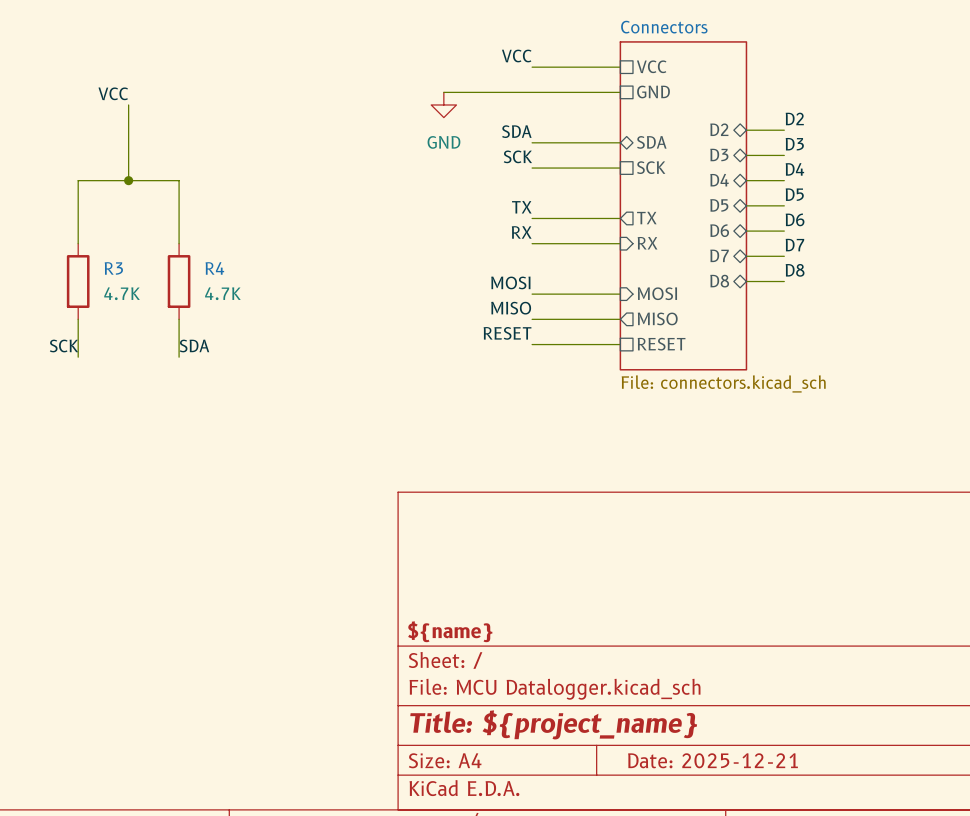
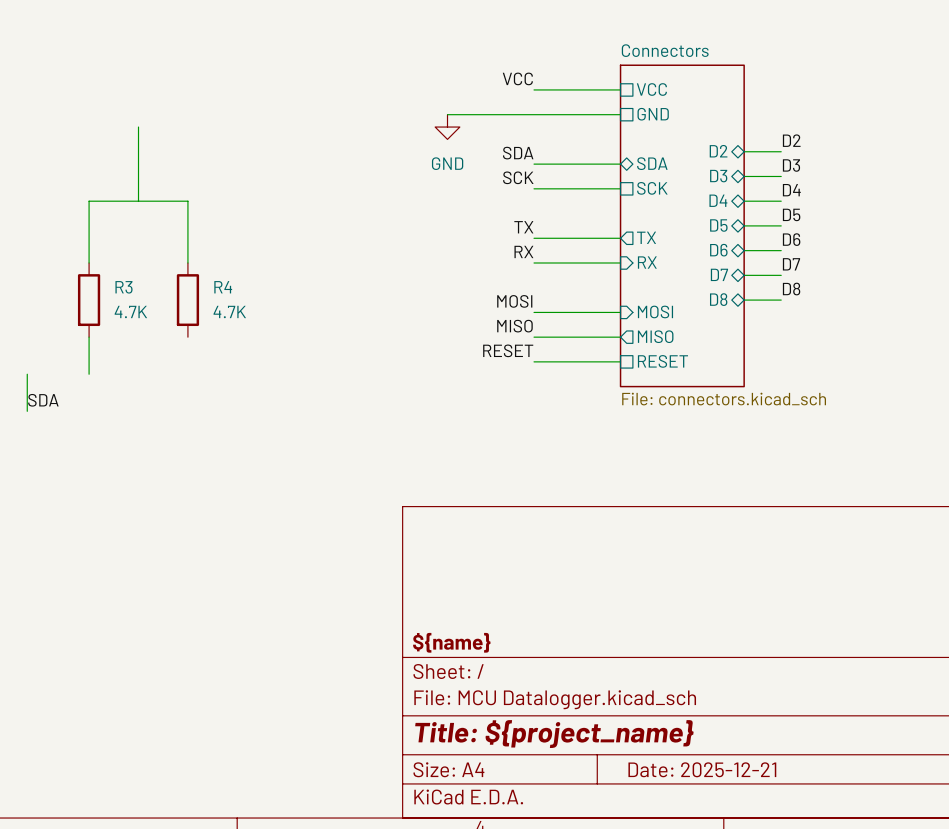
label: VCC (113, 93) -> none
junction: (128, 180) -> none
wire: (179, 319) (179, 357) -> (27, 374) (27, 411)
label: SCK (63, 345) -> none
label: SDA (194, 345) -> none
label: none -> SDA (43, 400)

